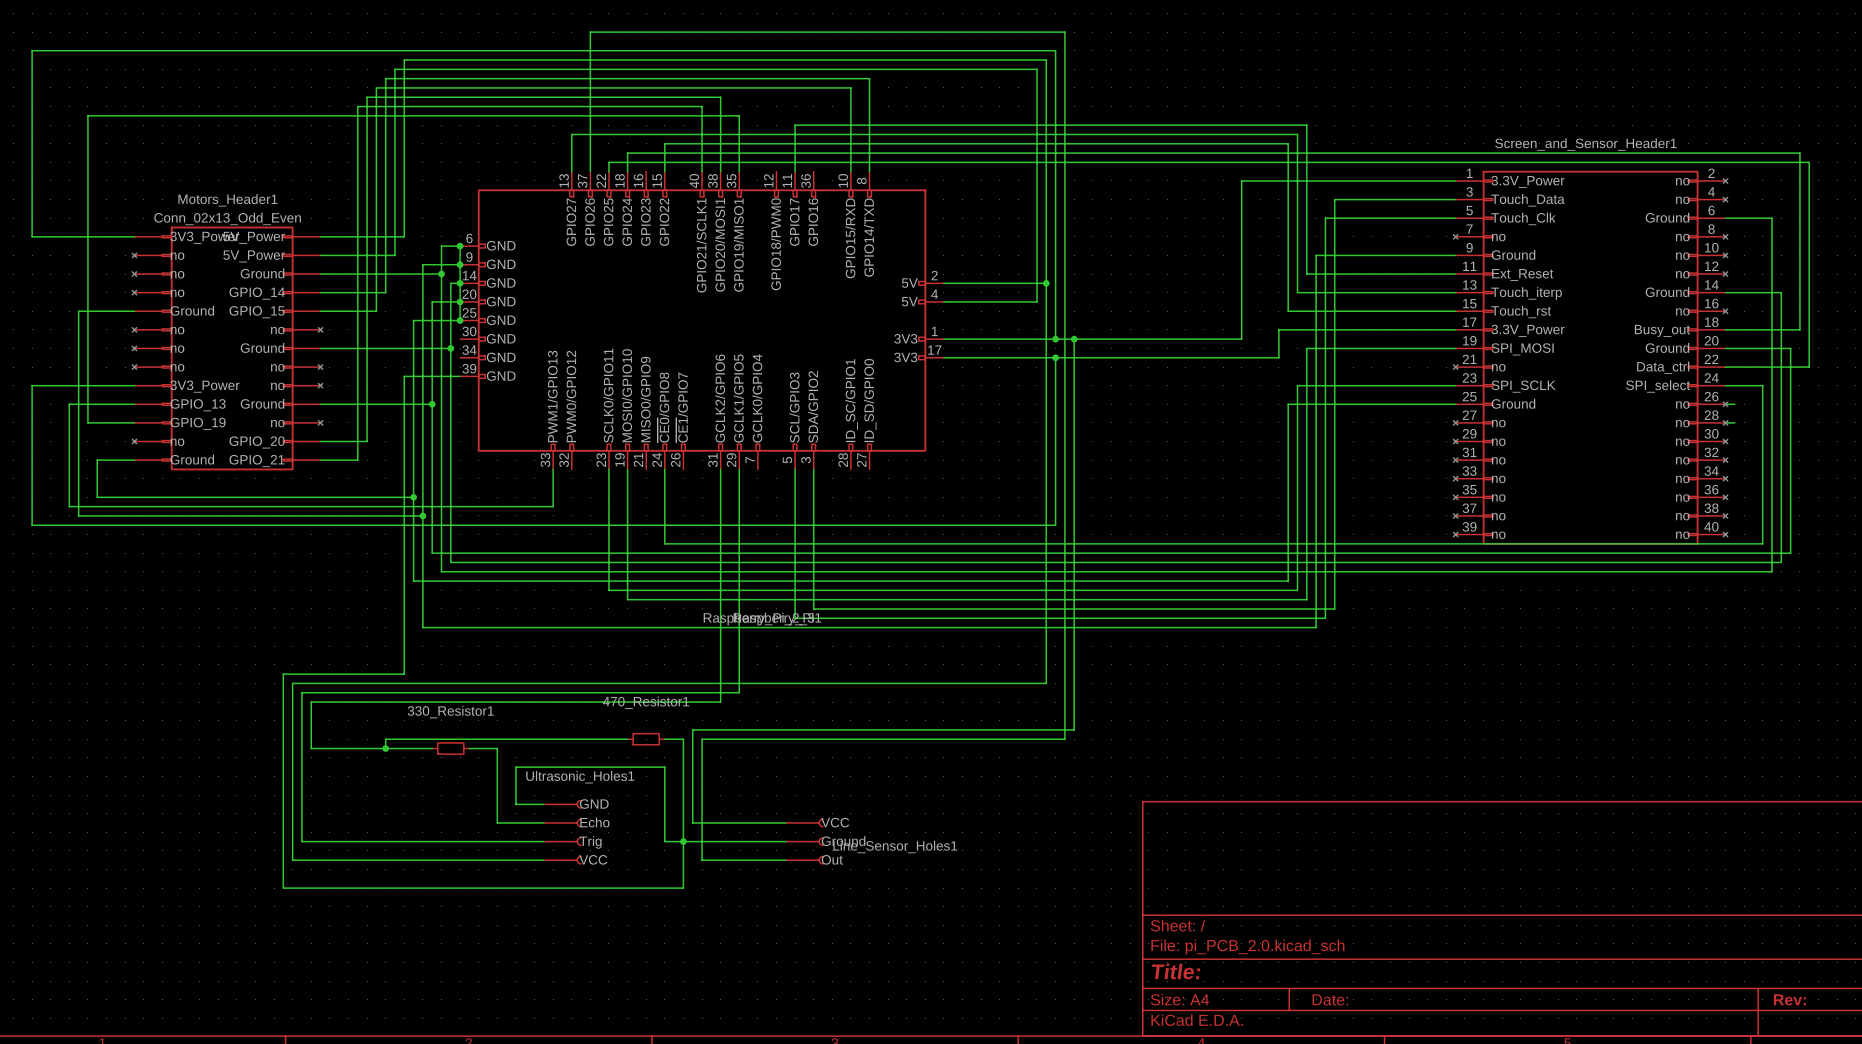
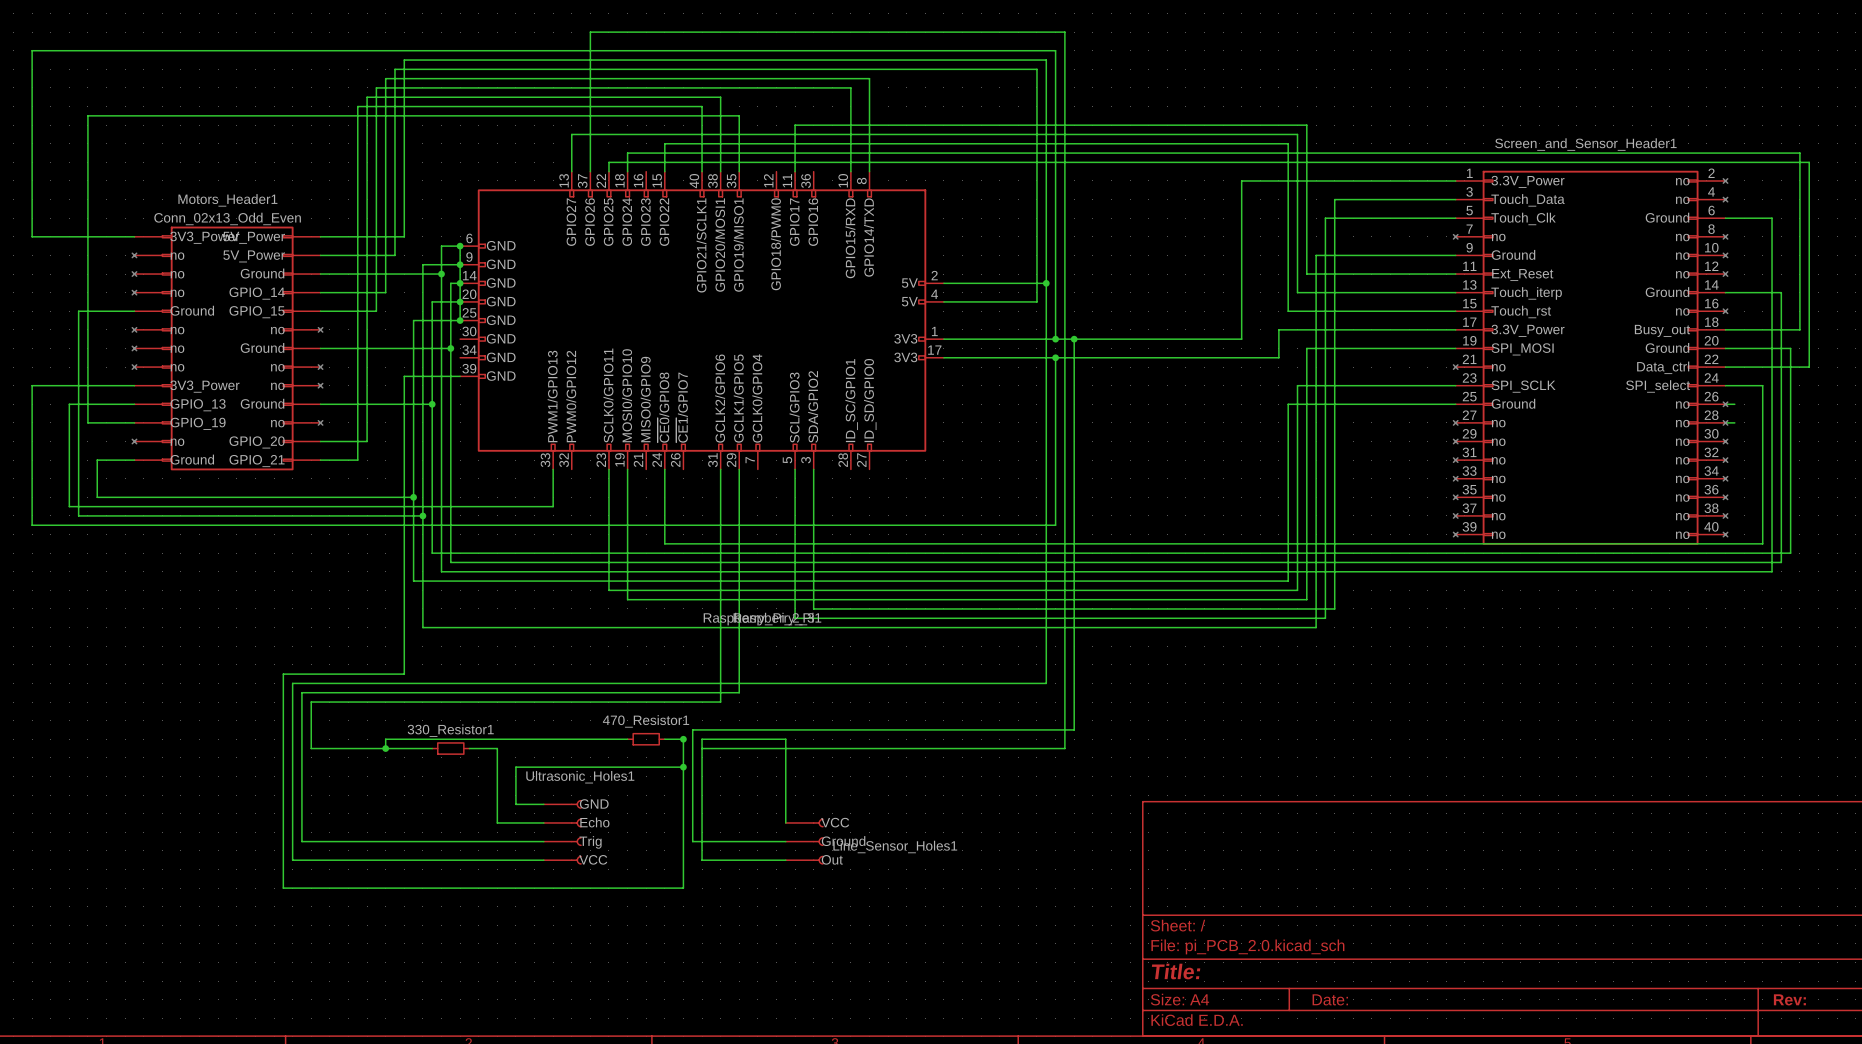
470_Resistor1 name position: 470_Resistor1 (646, 702) -> 470_Resistor1 (646, 721)
330_Resistor1 name position: 330_Resistor1 (450, 712) -> 330_Resistor1 (450, 730)
junction: none -> (683, 739)
wire: (785, 739) (1064, 739) -> (702, 748) (1064, 748) (1064, 739)
wire: (664, 767) (664, 841) (692, 841) -> (692, 822) (692, 841)
wire: none -> (664, 767) (683, 767)
junction: none -> (683, 767)
wire: (692, 822) (785, 822) -> (785, 739) (785, 822)
junction: (683, 841) -> none

